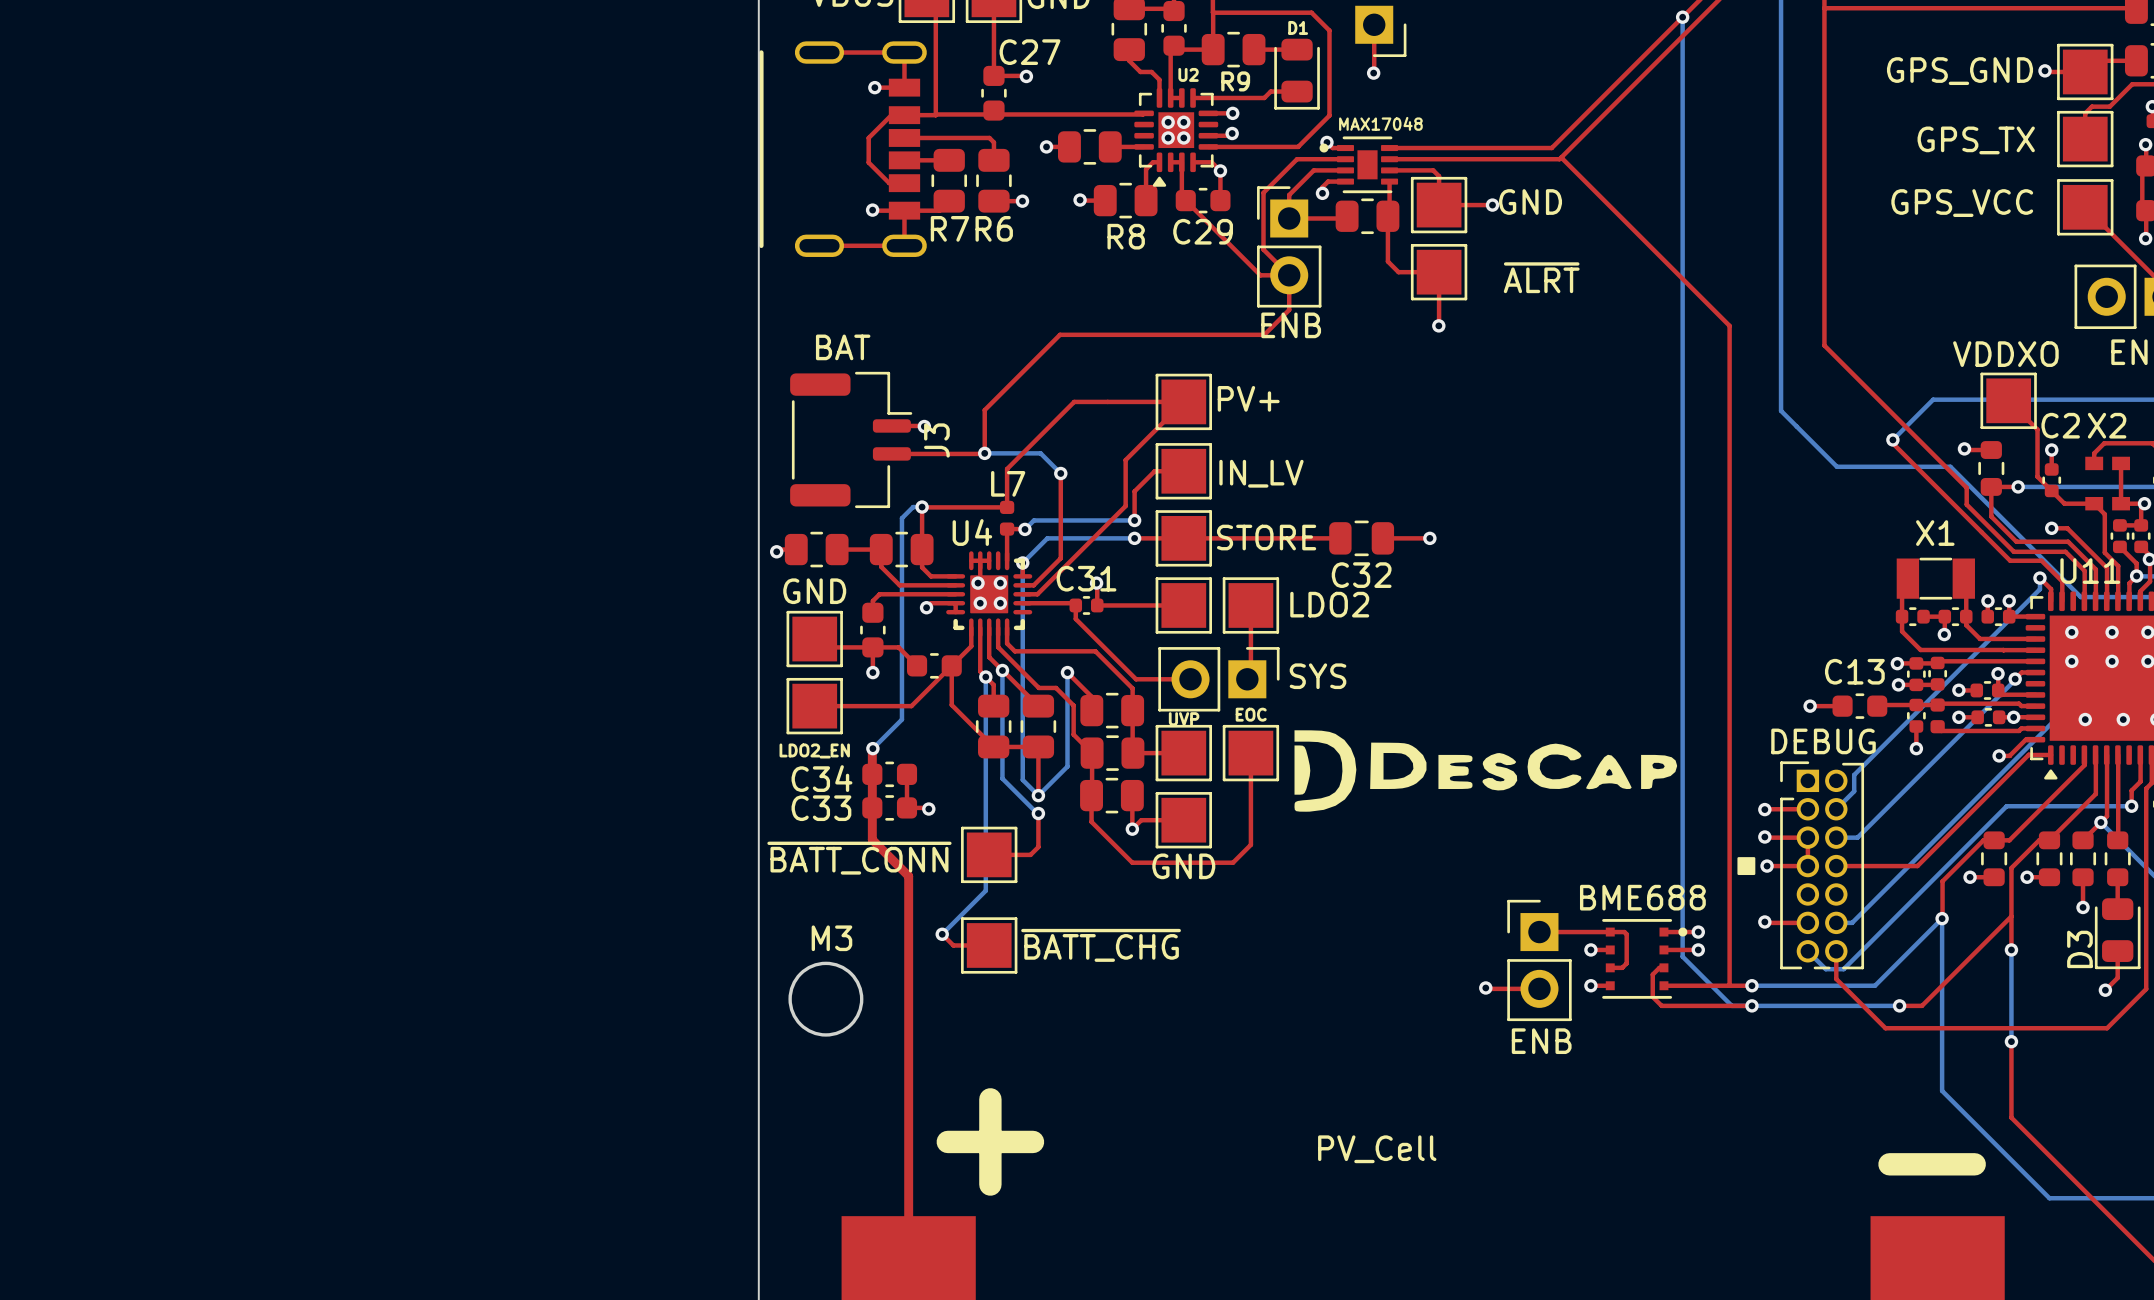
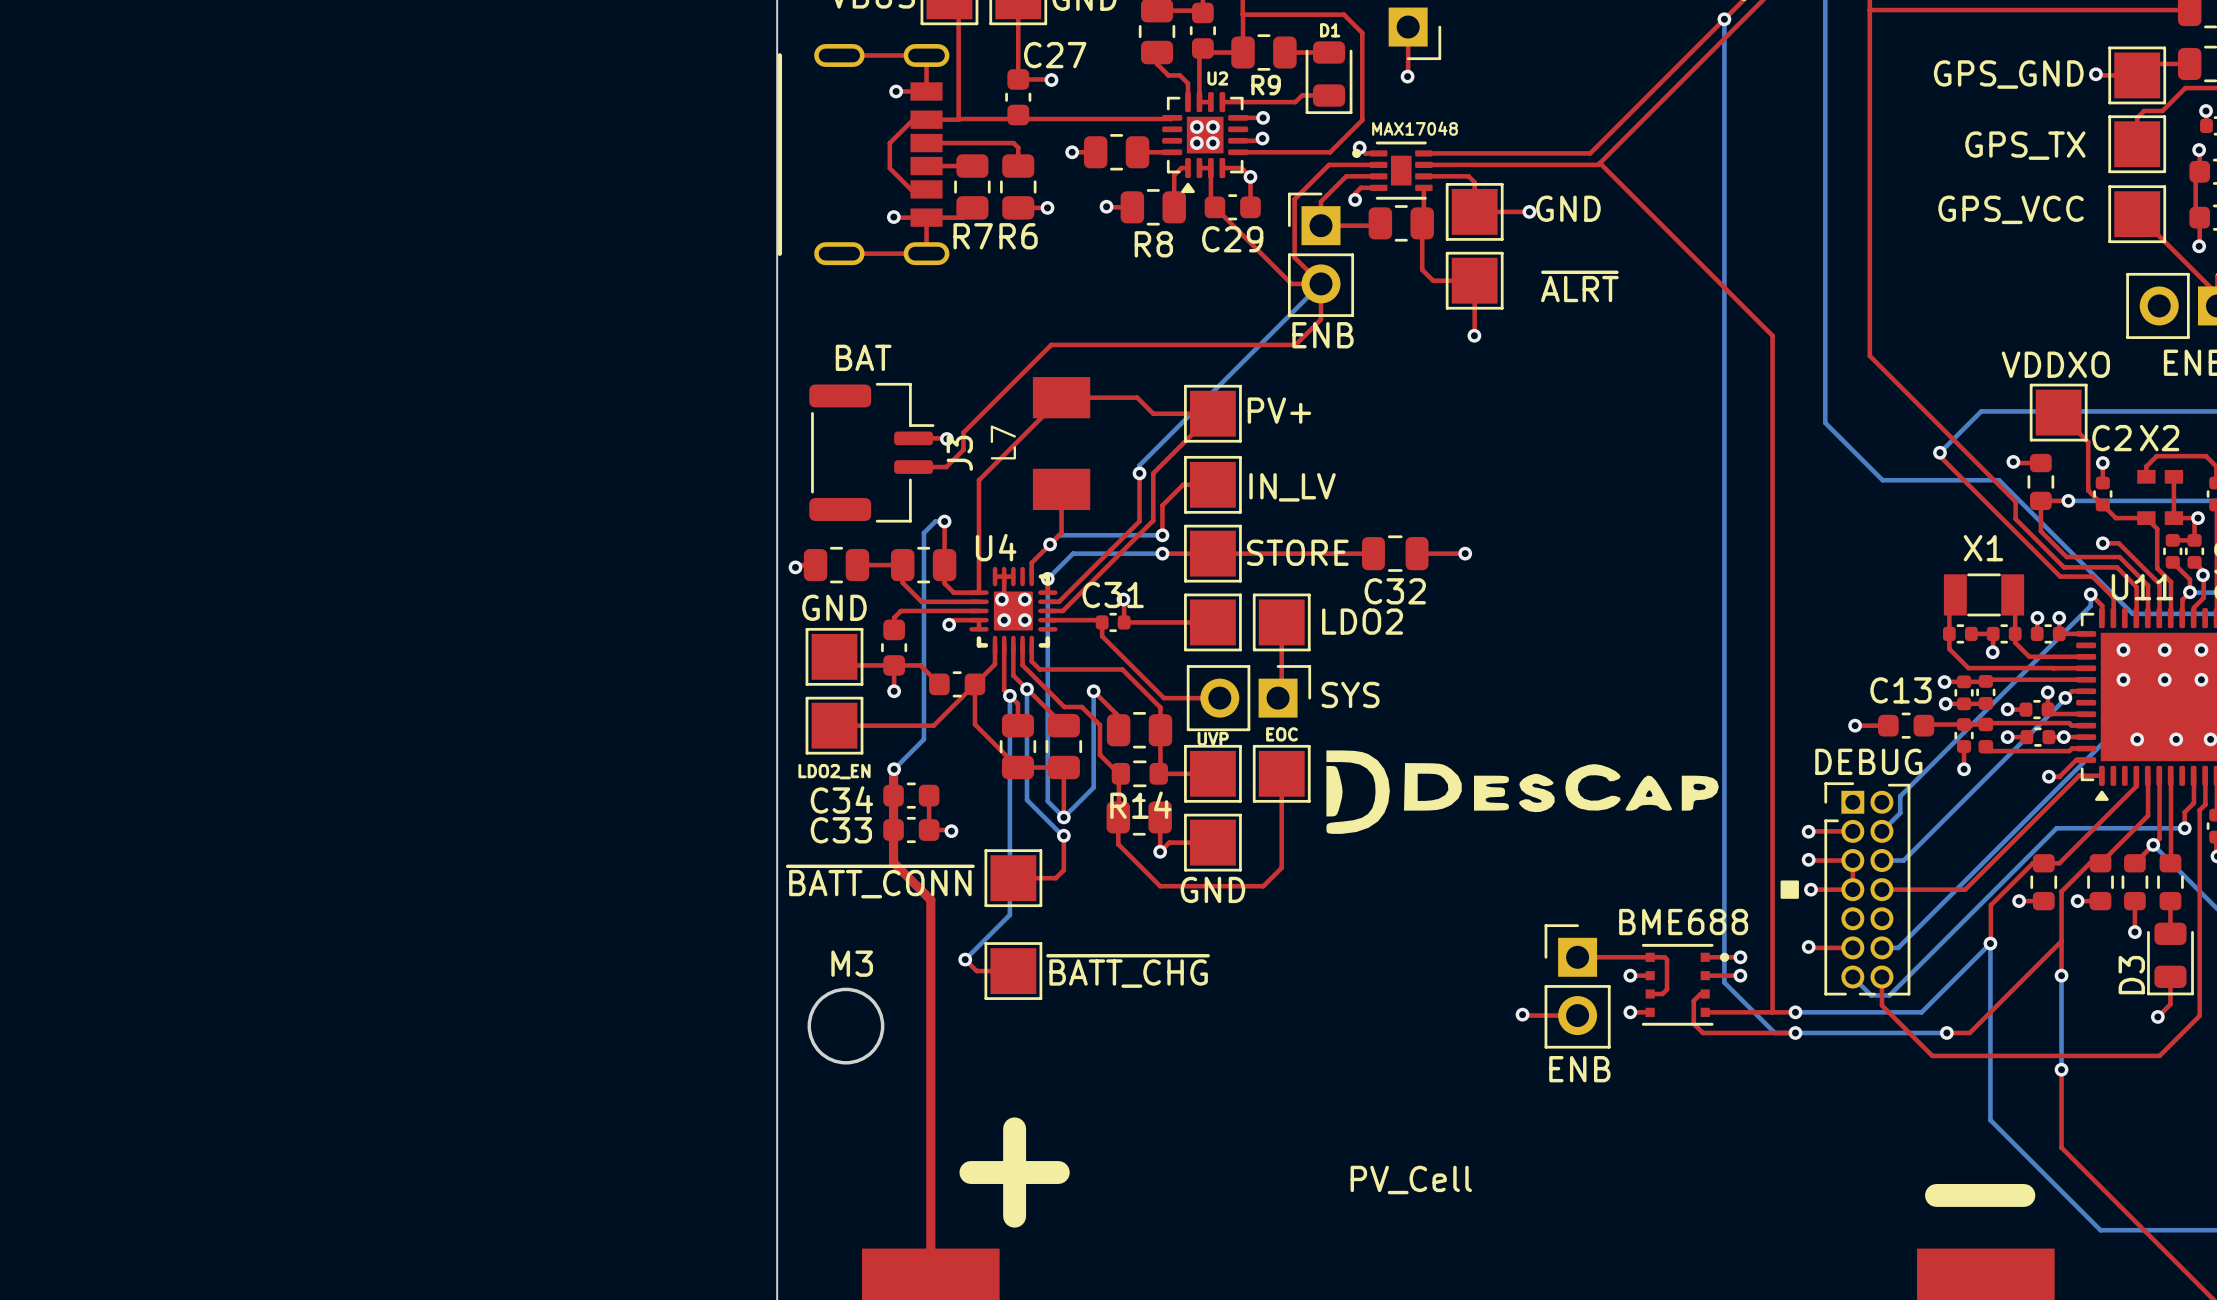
bottom track: none -> (1321, 283) (1139, 465) (1139, 473)
top track: (1060, 334) (984, 410) (984, 453) (923, 453) -> (1085, 344) (1051, 344) (963, 432) (963, 449) (946, 467)
top track: (1125, 401) (1074, 401) (1007, 469) (1007, 507) (922, 507) -> (1153, 413) (1137, 397) (1061, 397) (978, 480) (978, 592)
bottom track: (984, 453) (1040, 453) (1060, 473) -> none
via: (984, 453) -> none
top track: (1060, 473) (1060, 558) -> (1139, 473) (1139, 521) (1086, 574)
via position: (1060, 473) -> (1139, 473)
L7 name position: L7 (1008, 483) -> L7 (1003, 442)
L7 footprint: [999, 500, 1015, 536] -> [1032, 377, 1091, 511]
top track: (1024, 529) (1007, 529) (1007, 547) -> (1061, 489) (1061, 533) (1031, 562)
part: (1112, 753) -> none
R14: none -> (1139, 773)

